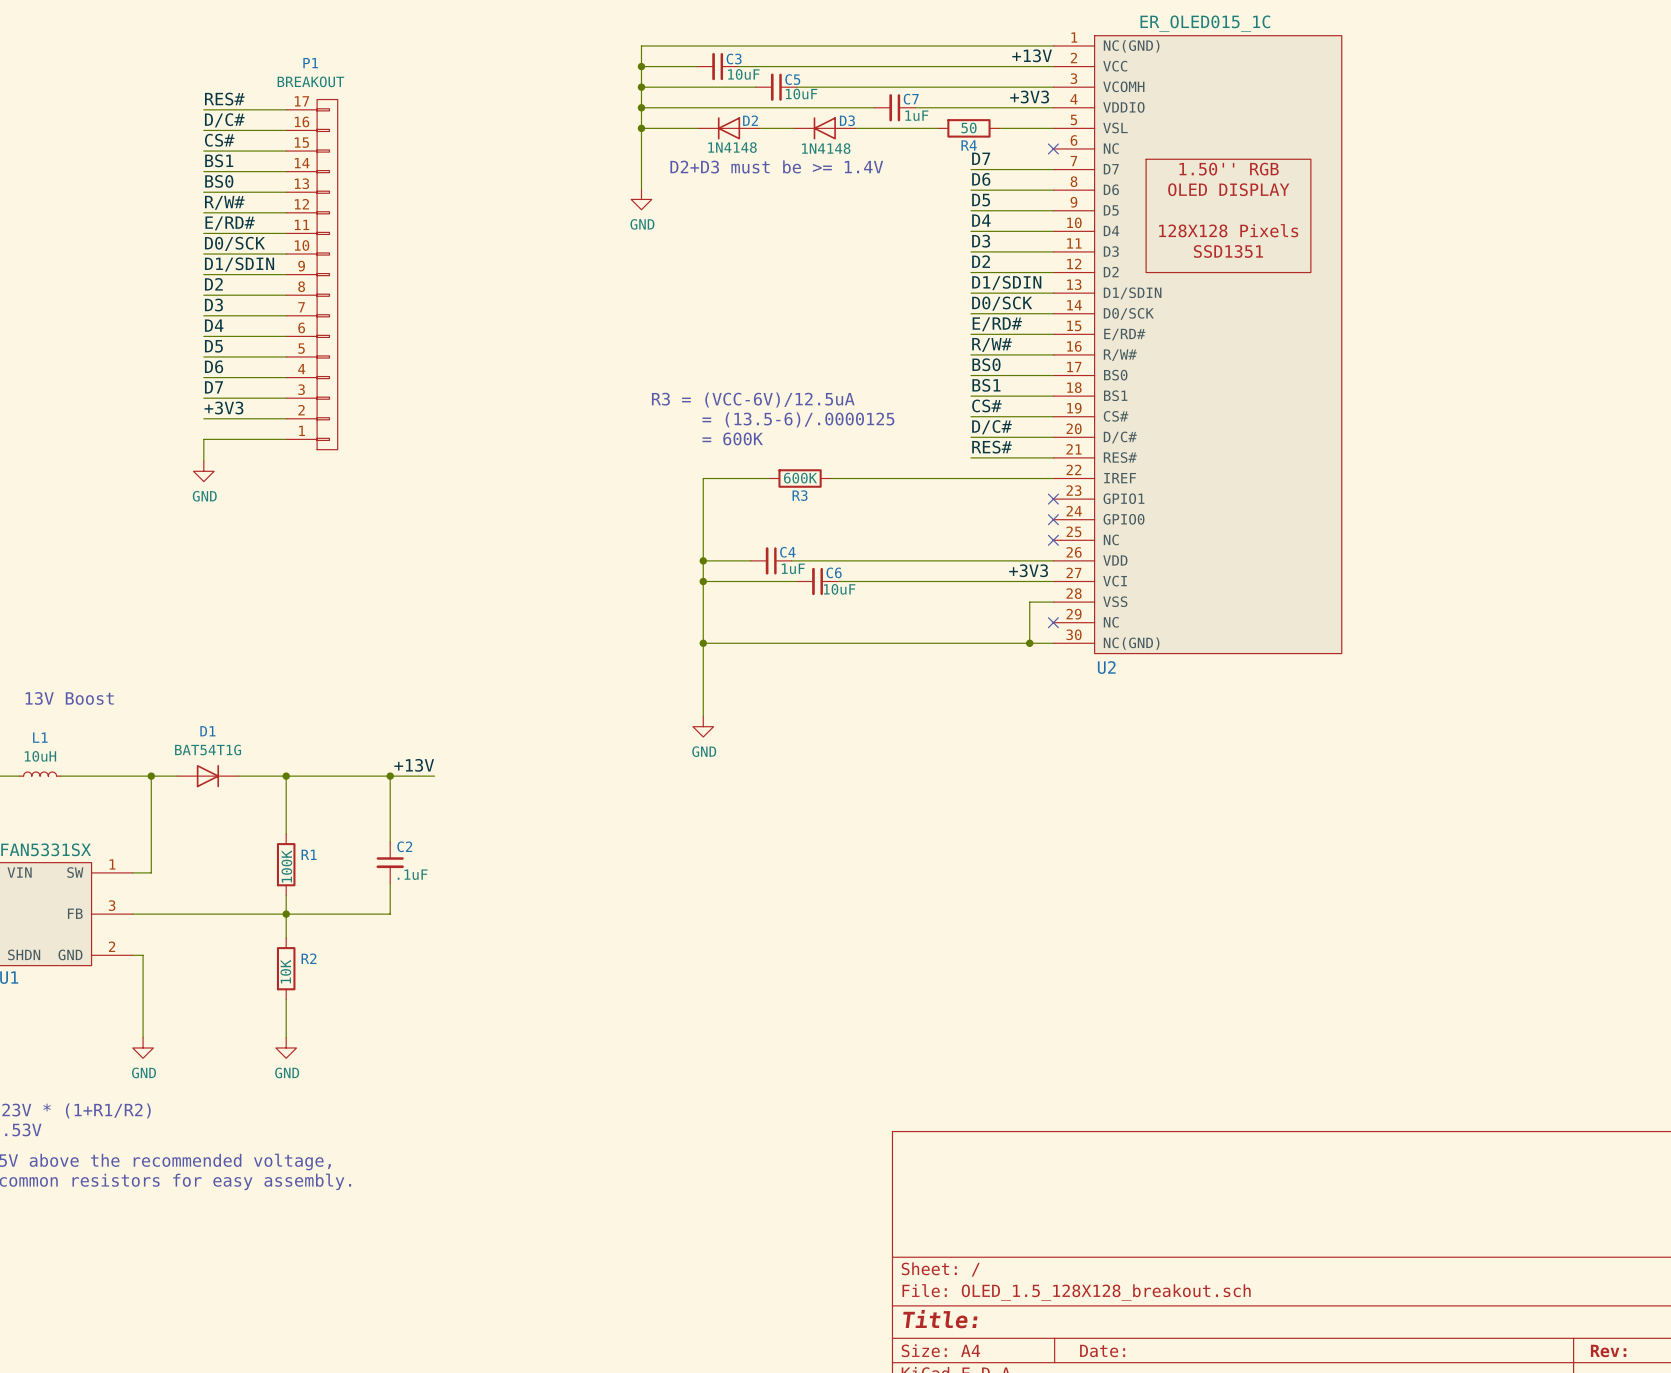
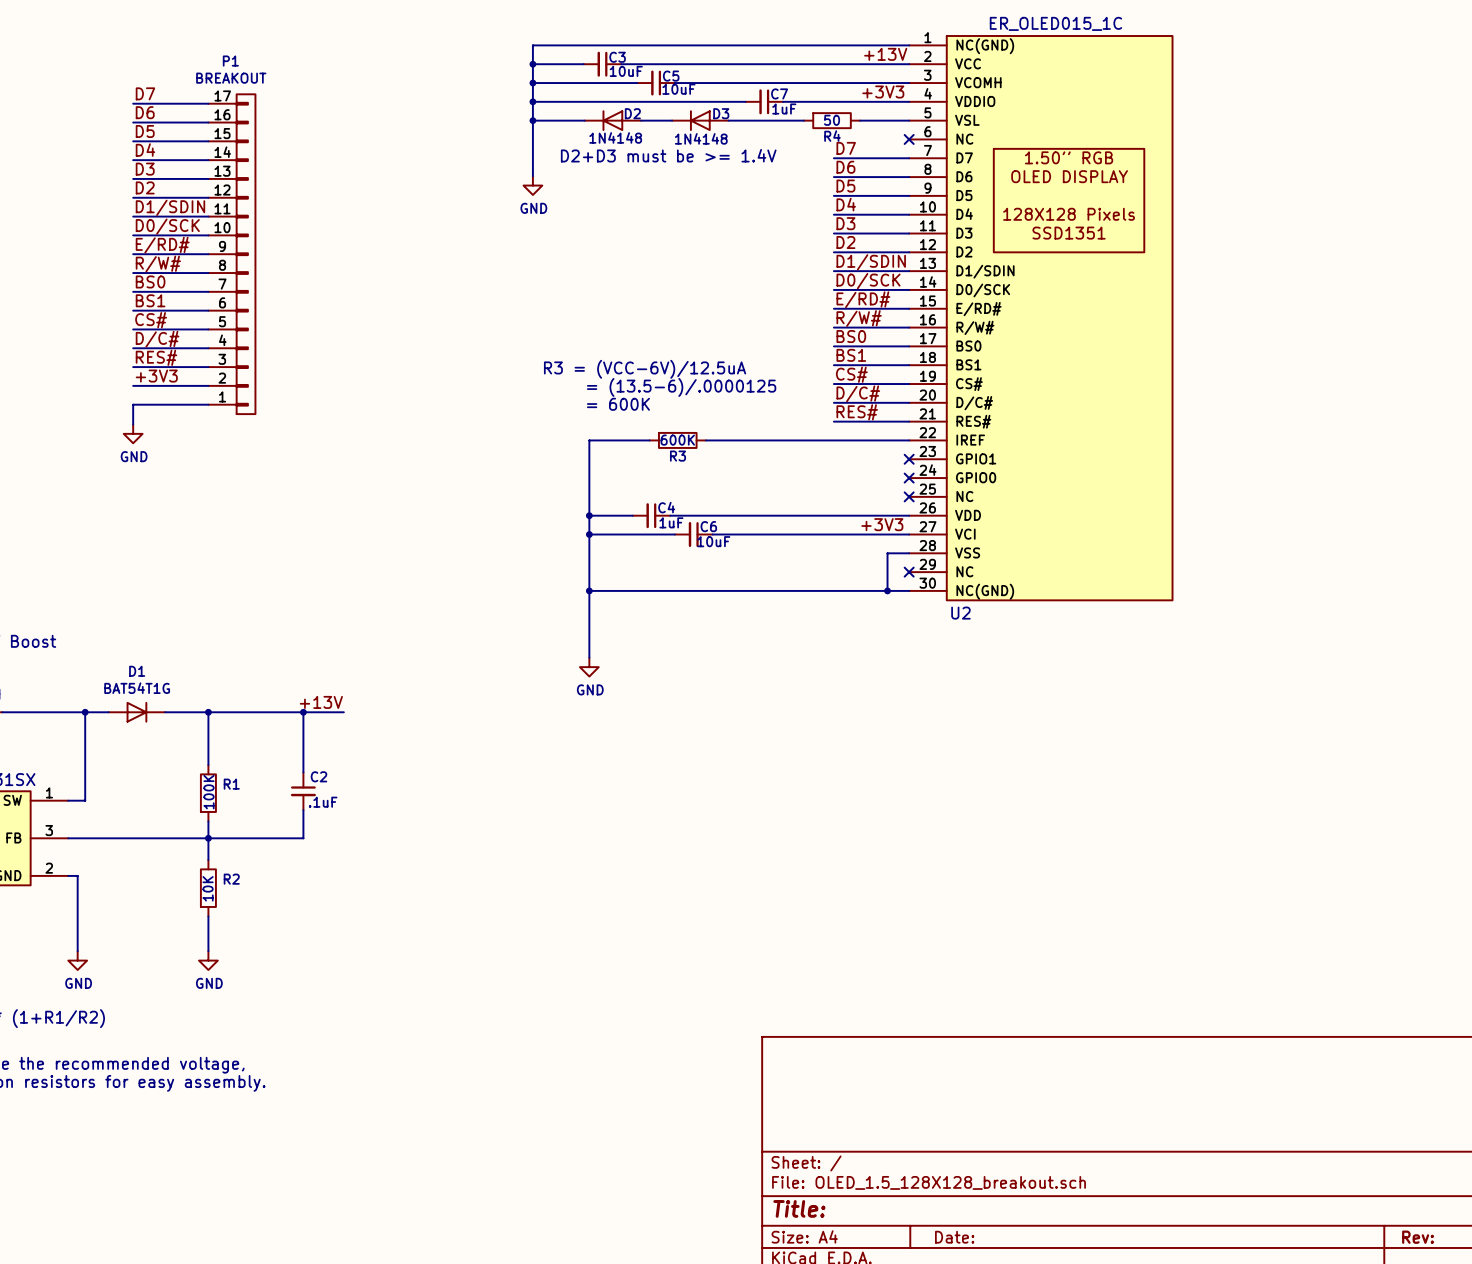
label: RES# (224, 99) -> D7 (145, 93)
label: D/C# (224, 120) -> D6 (145, 112)
label: CS# (219, 140) -> D5 (145, 131)
label: BS1 (219, 160) -> D4 (145, 150)
label: BS0 (219, 181) -> D3 (145, 169)
label: R/W# (224, 202) -> D2 (145, 187)
label: E/RD# (230, 223) -> D1/SDIN (170, 207)
label: D1/SDIN (239, 264) -> E/RD# (162, 245)
label: D2 (213, 284) -> R/W# (158, 263)
label: D3 (213, 305) -> BS0 (150, 281)
label: D4 (214, 325) -> BS1 (150, 300)
label: D5 (213, 346) -> CS# (151, 320)
label: D6 (214, 366) -> D/C# (157, 339)
label: D7 (213, 387) -> RES# (156, 357)

